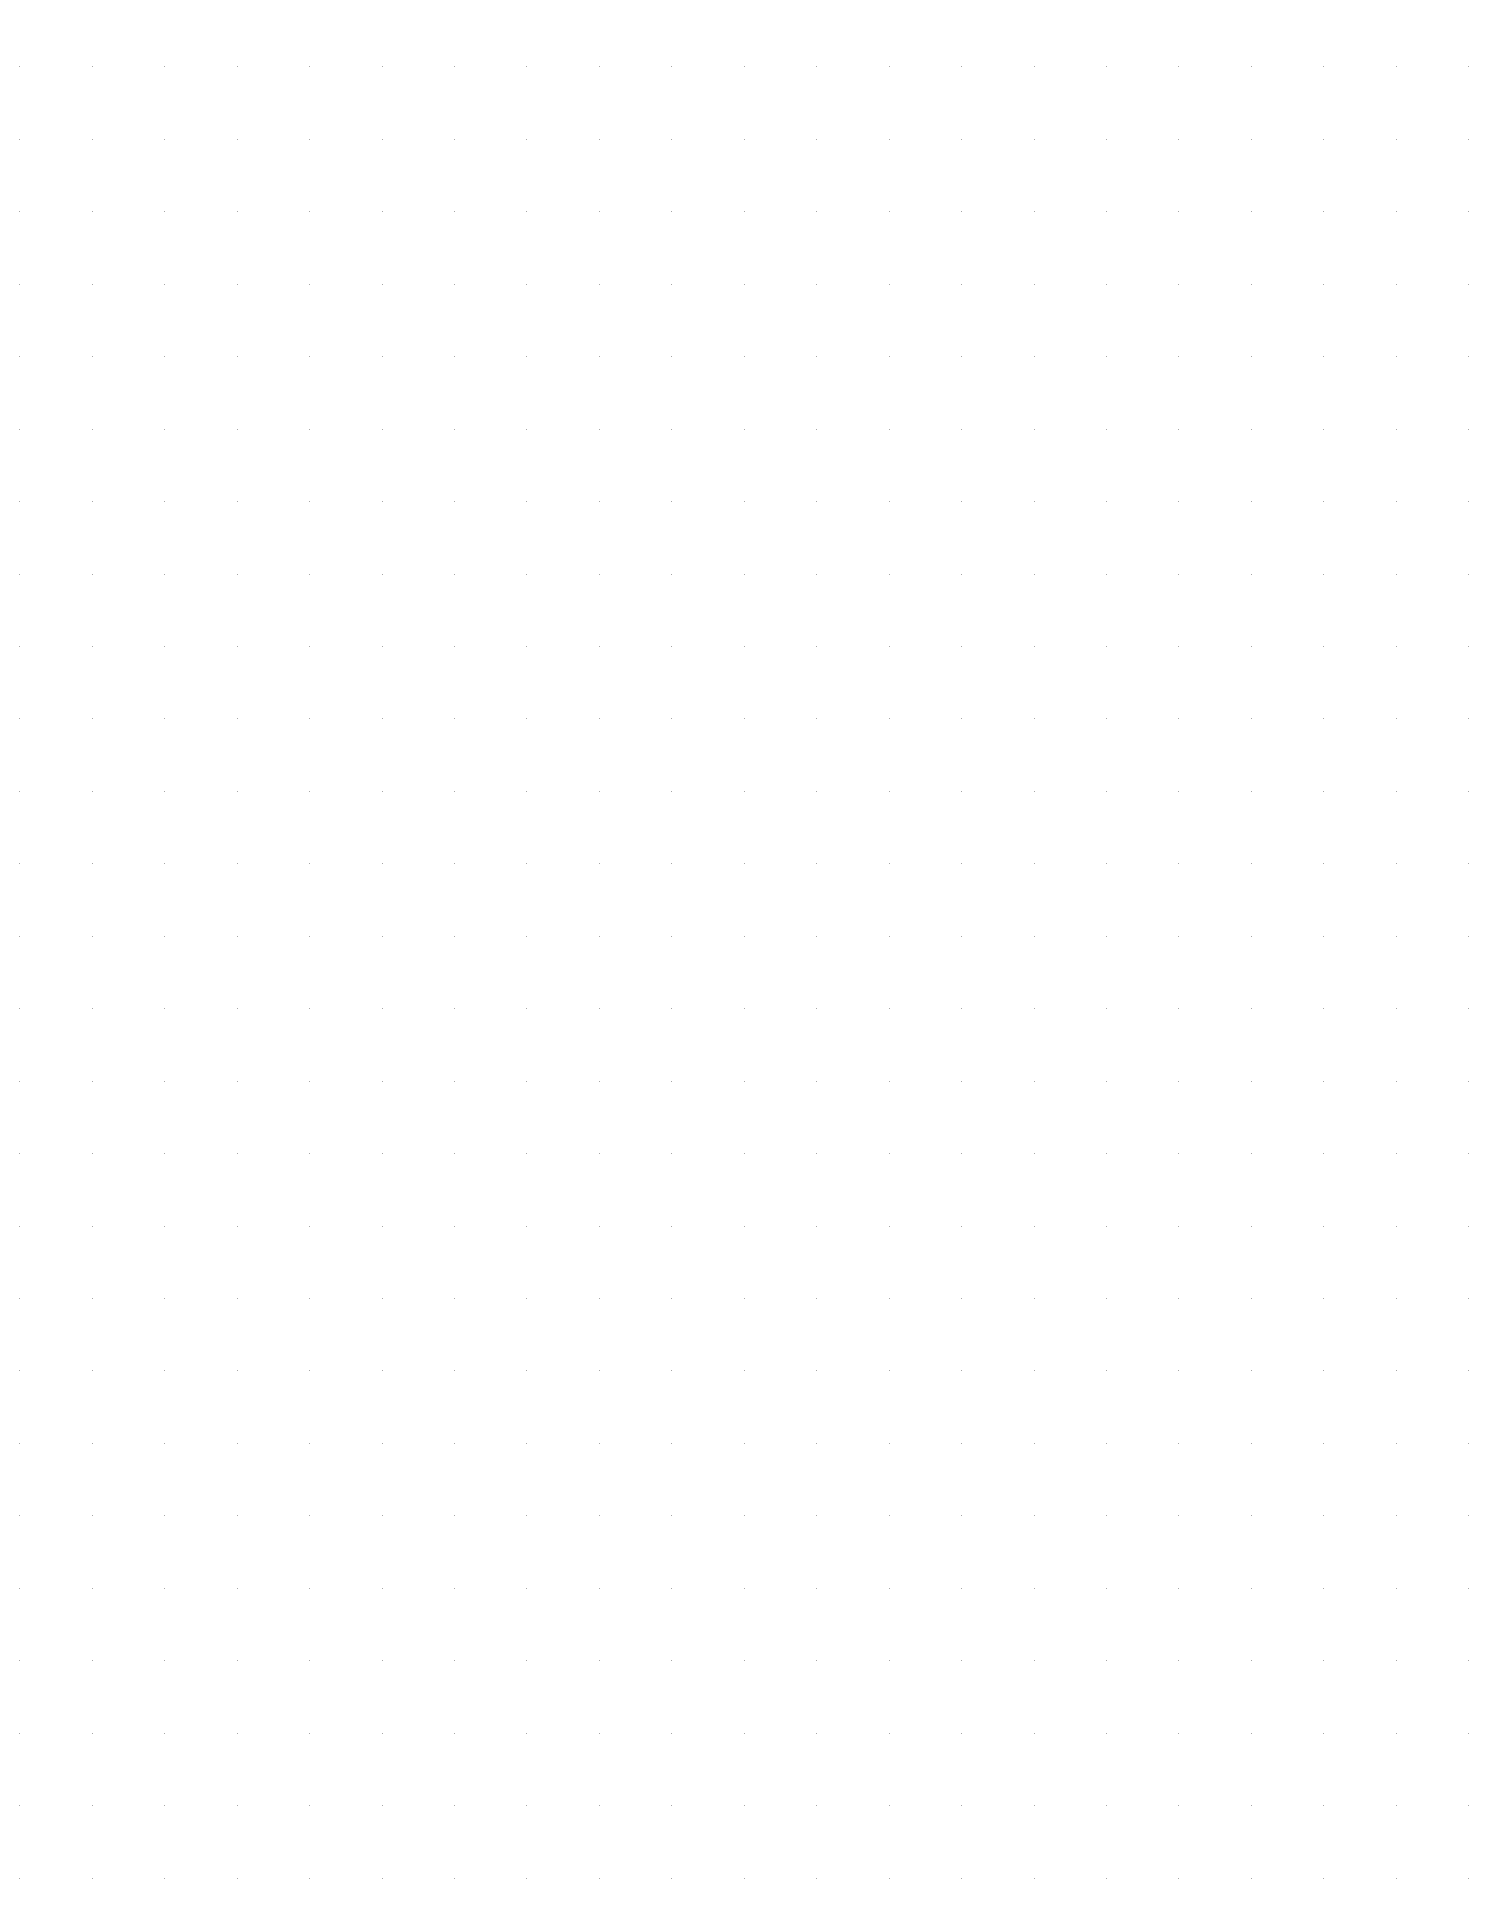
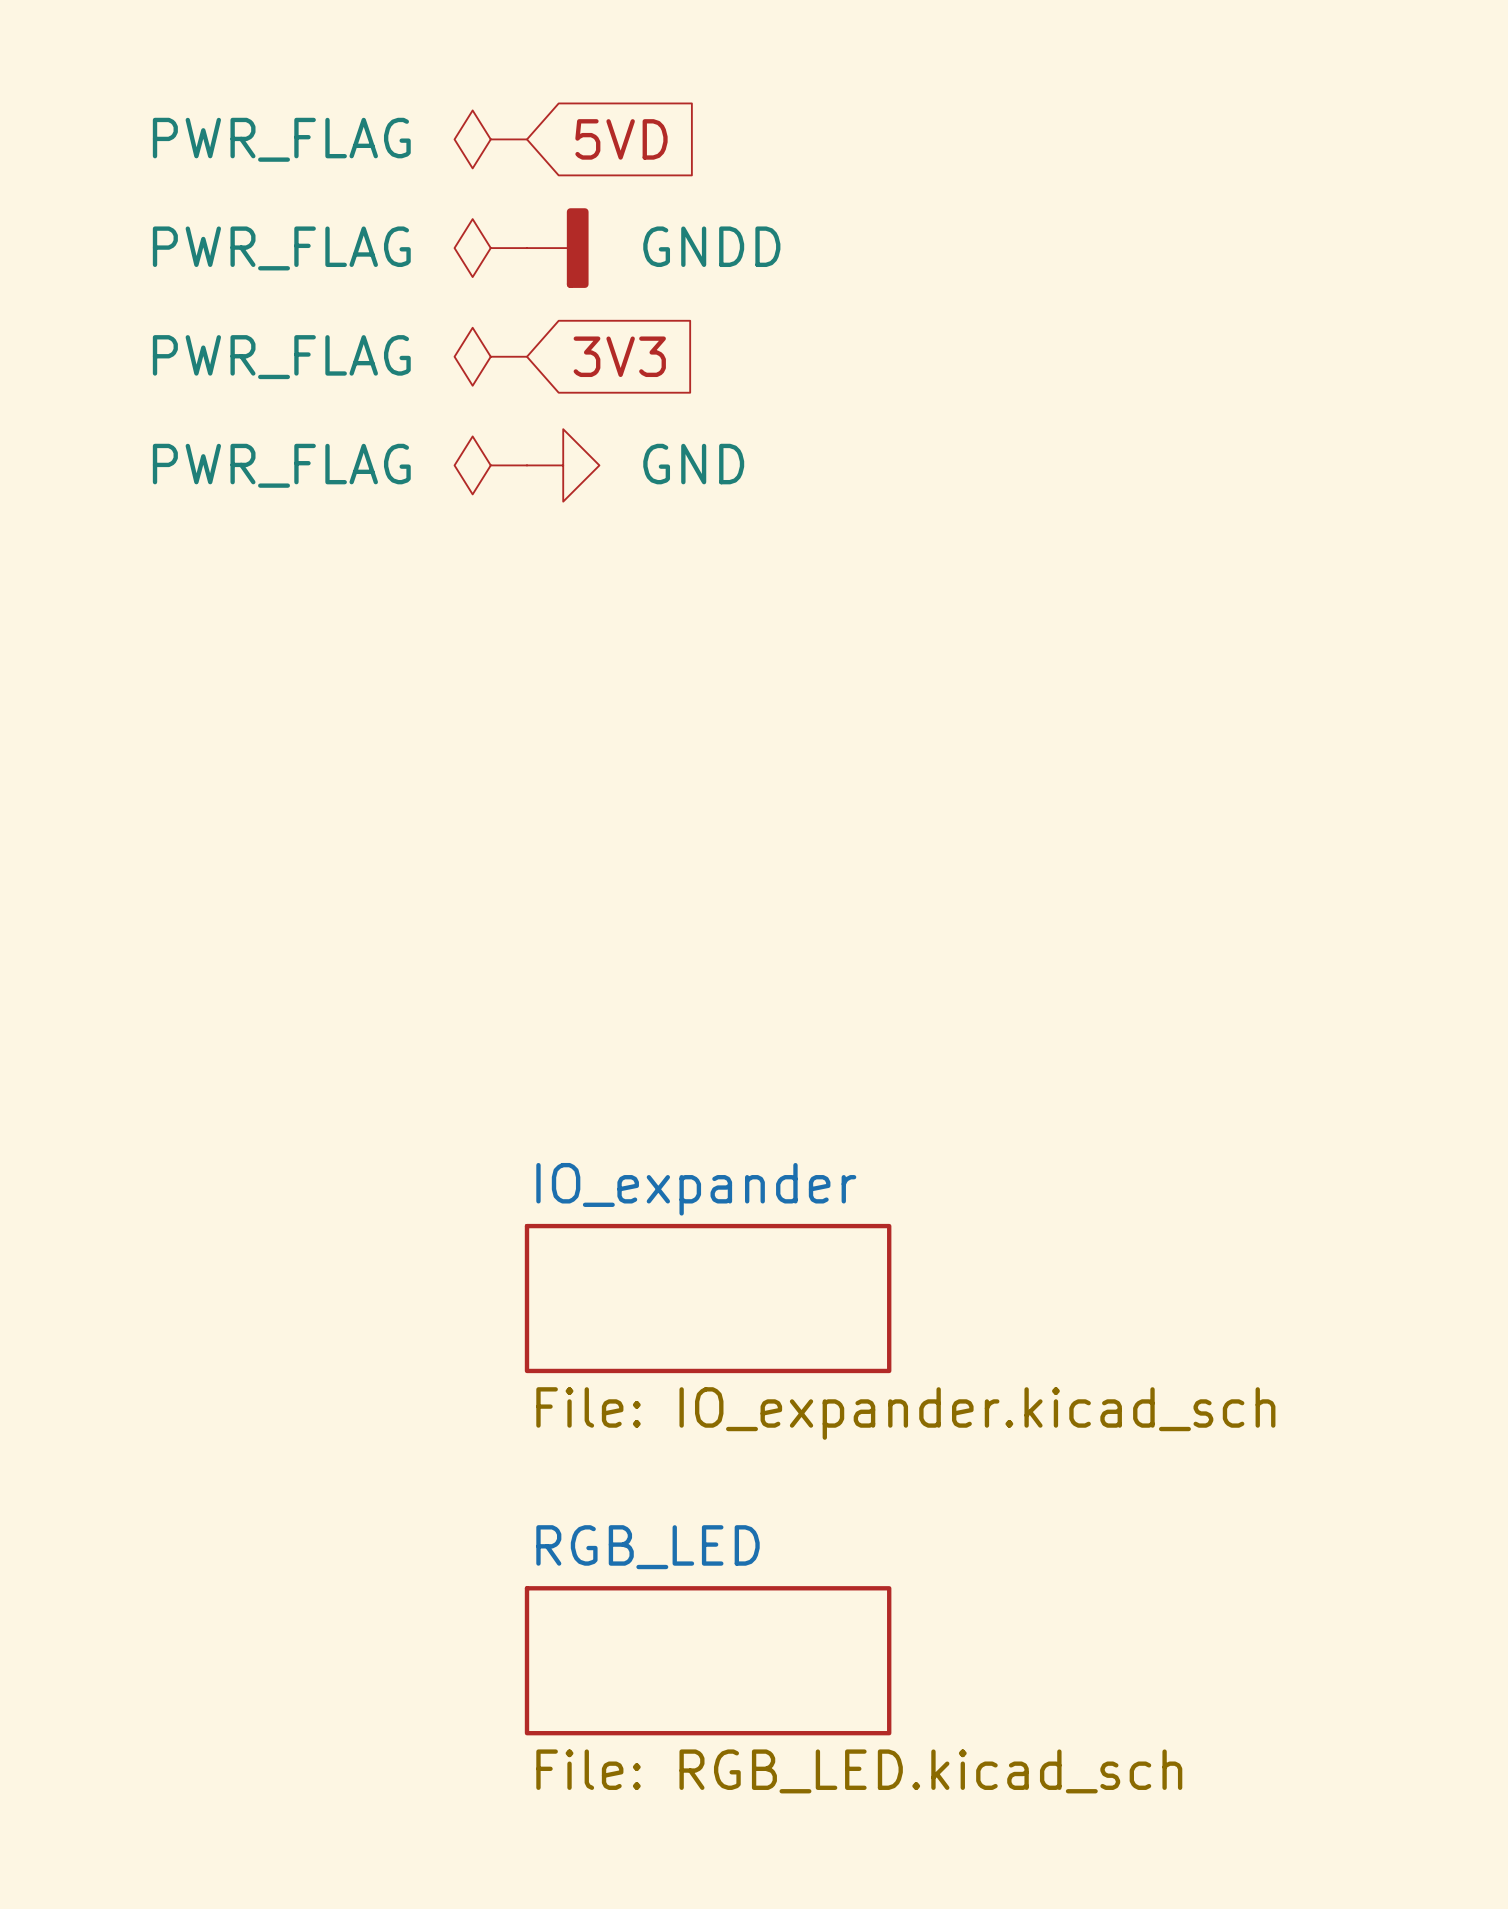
power symbol: none -> PWR_FLAG (490, 139)
global label: none -> 5VD (621, 139)
power symbol: none -> PWR_FLAG (490, 248)
power symbol: none -> GNDD (557, 248)
power symbol: none -> PWR_FLAG (490, 356)
global label: none -> 3V3 (619, 356)
power symbol: none -> PWR_FLAG (490, 465)
power symbol: none -> GND (563, 465)
sheet IO_expander: none -> File: IO_expander.kicad_sch (708, 1298)
sheet RGB_LED: none -> File: RGB_LED.kicad_sch (708, 1660)

